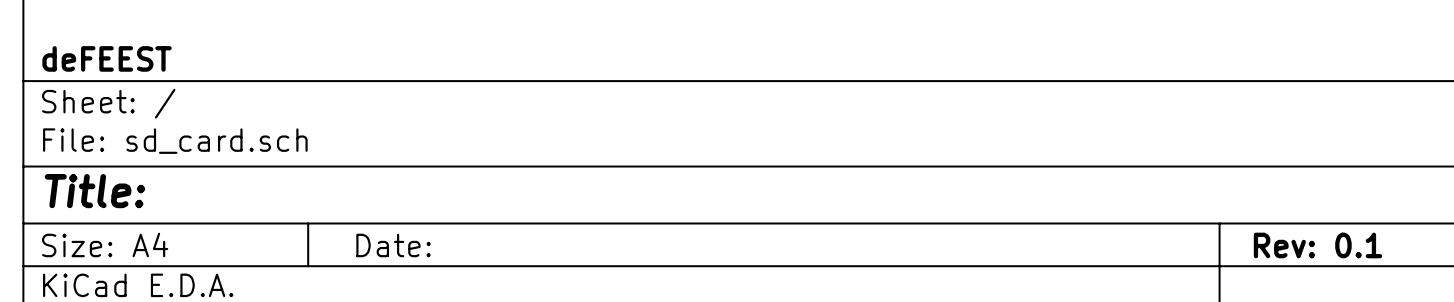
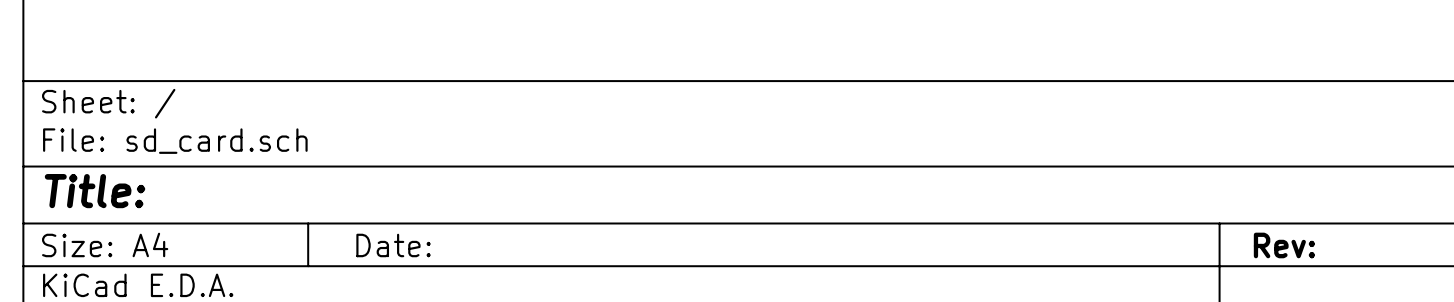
title block: deFEEST (107, 58) -> none
title block: Rev: 0.1 (1318, 245) -> Rev: (1284, 245)

